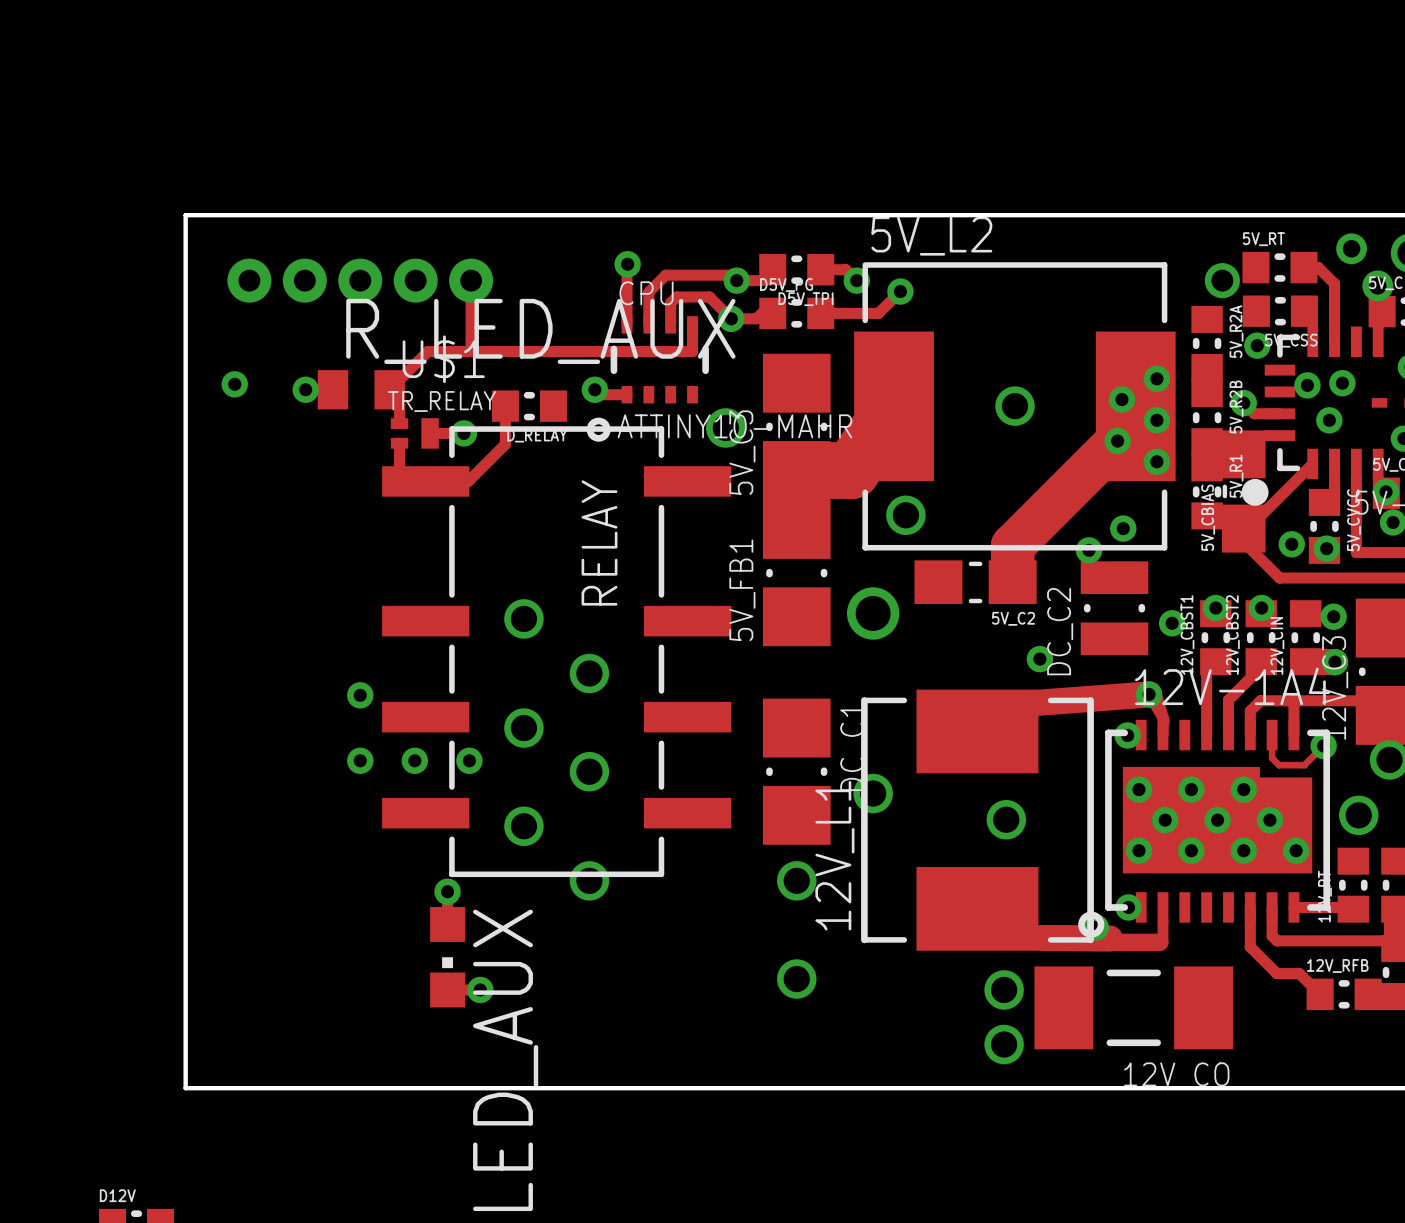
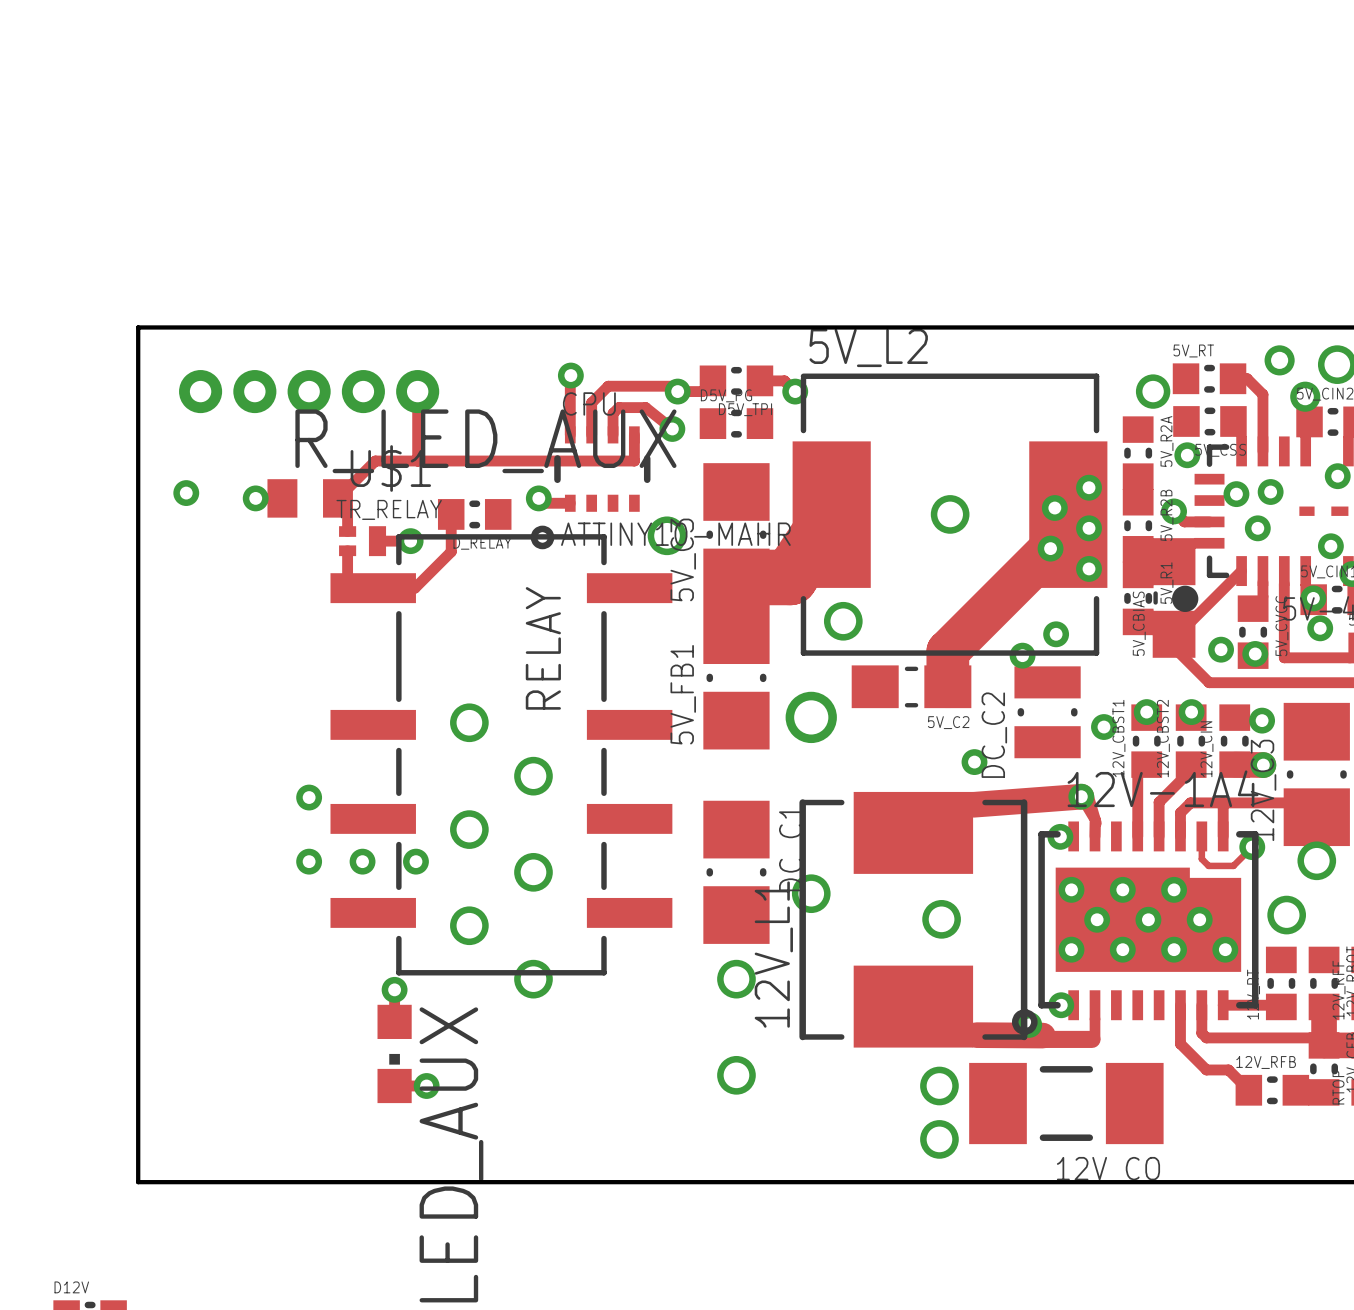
track: (900, 291) (878, 313) (820, 313) (826, 318) -> none
via: (900, 291) -> none
track: (704, 297) (709, 297) (731, 318) (756, 318) (767, 307) (772, 313) -> (645, 407) (672, 428)

